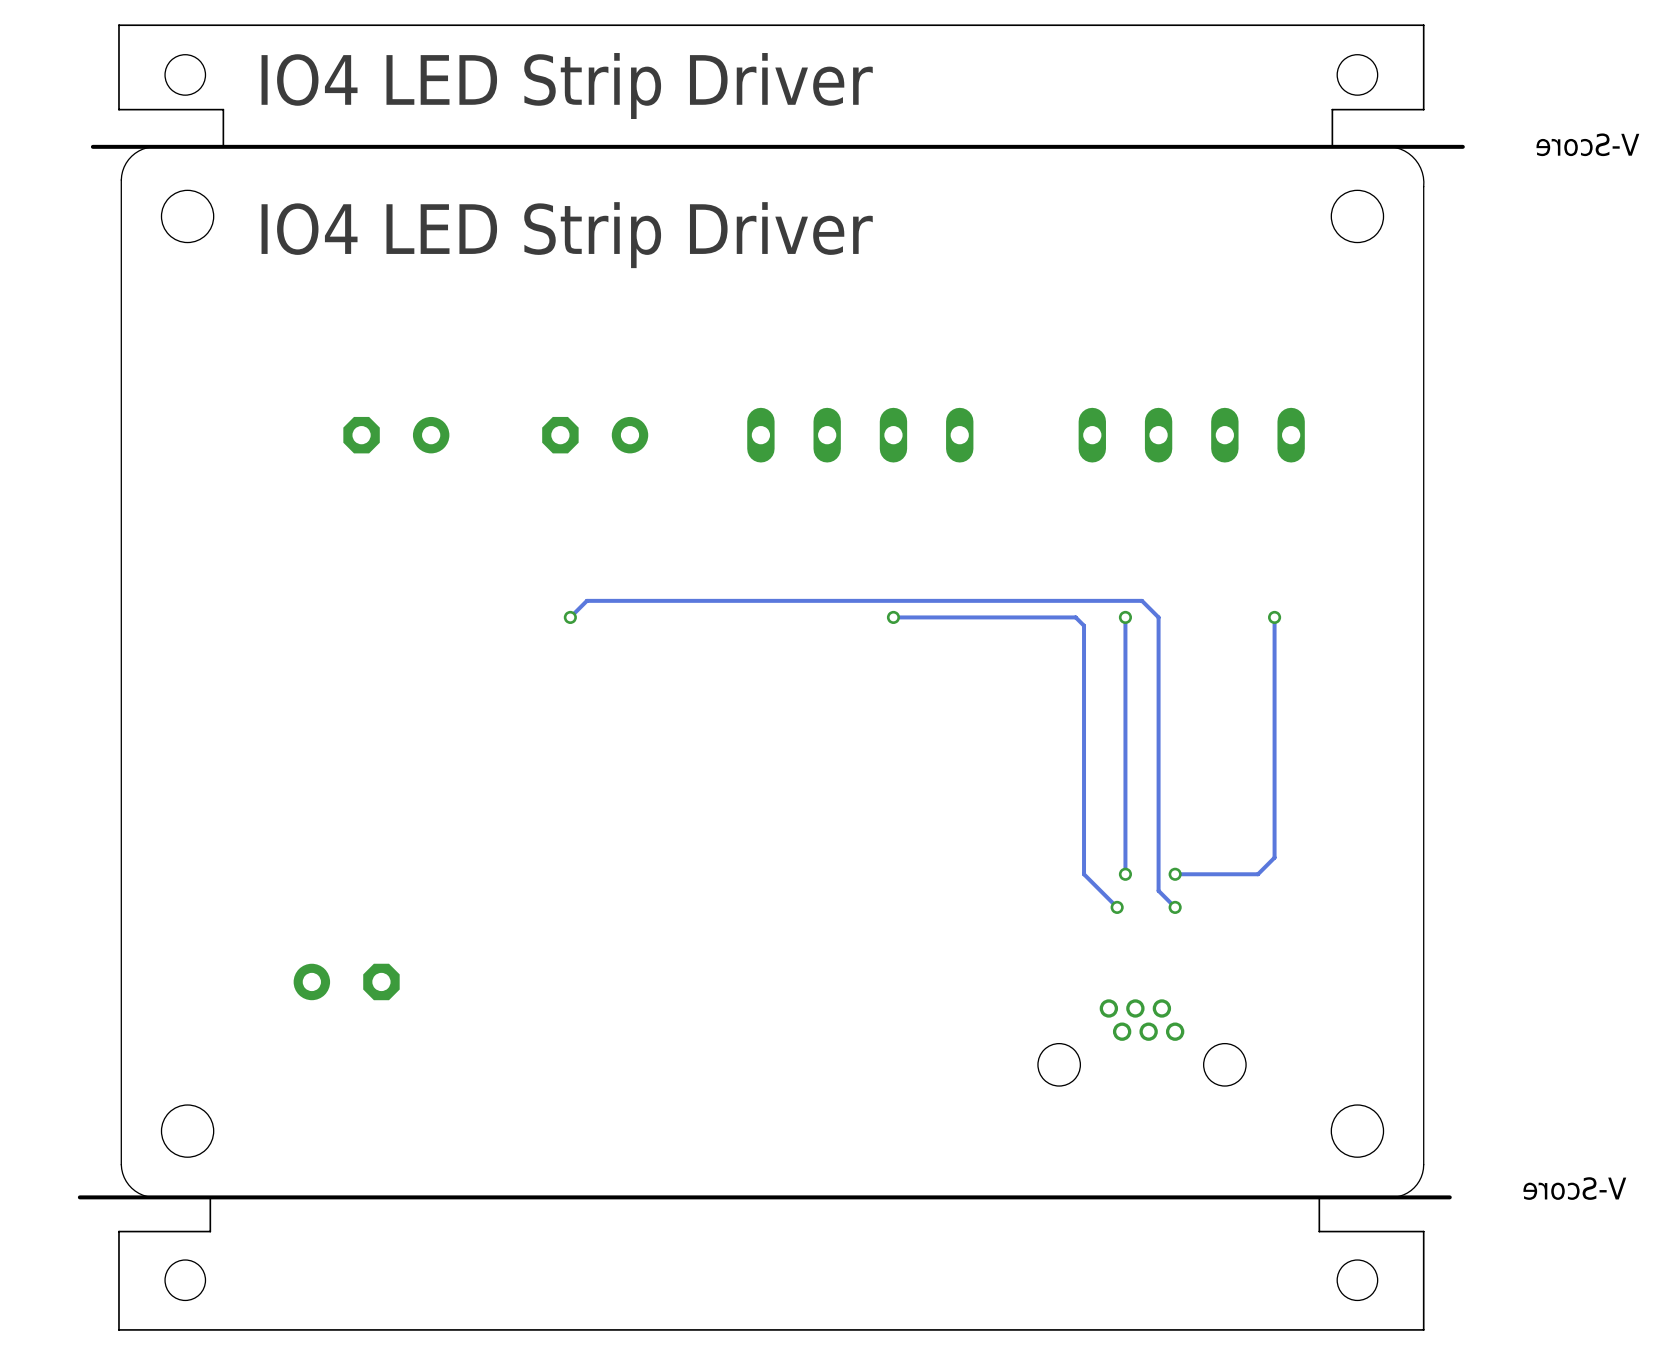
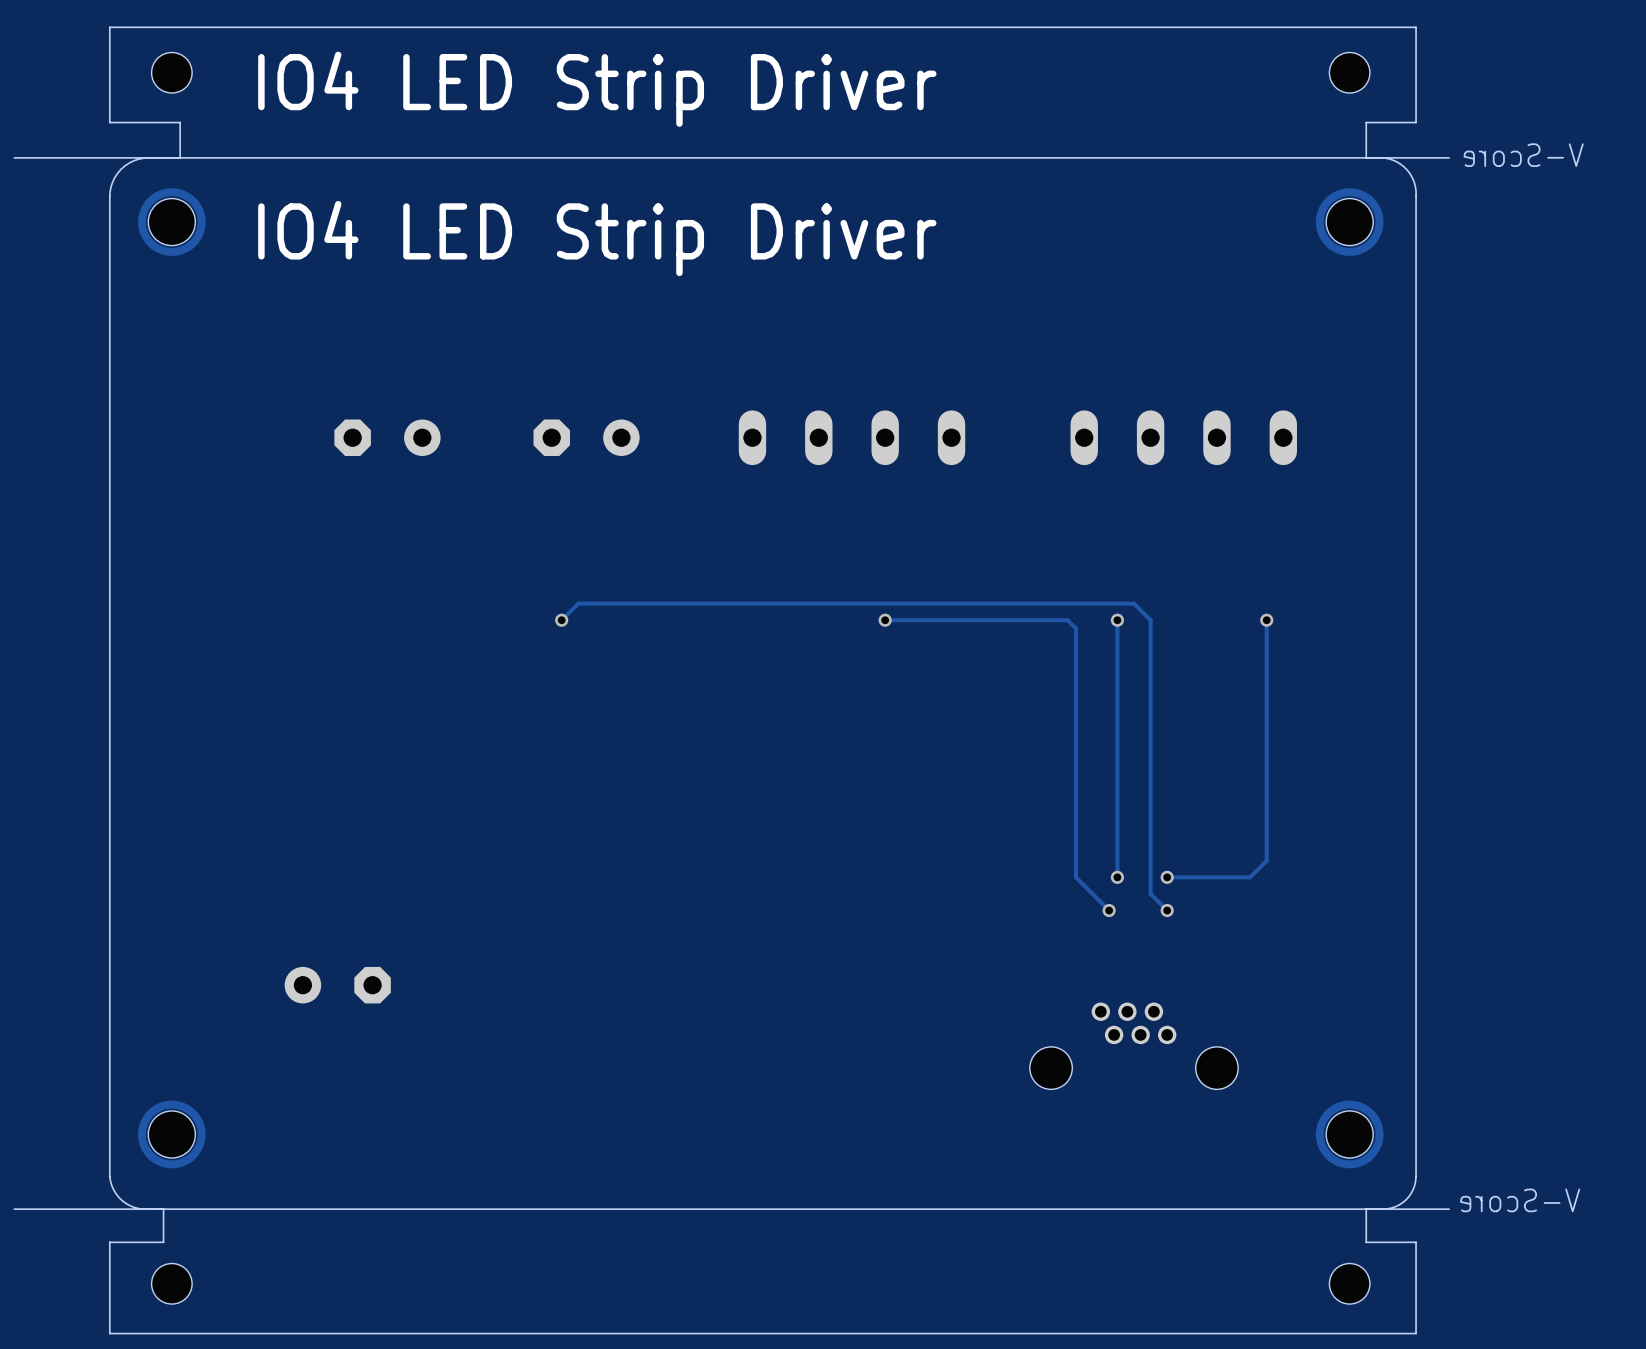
part: none -> (171, 222)
part: none -> (1349, 222)
part: none -> (731, 680)
part: (771, 677) -> none
part: none -> (171, 1134)
part: none -> (1349, 1134)

